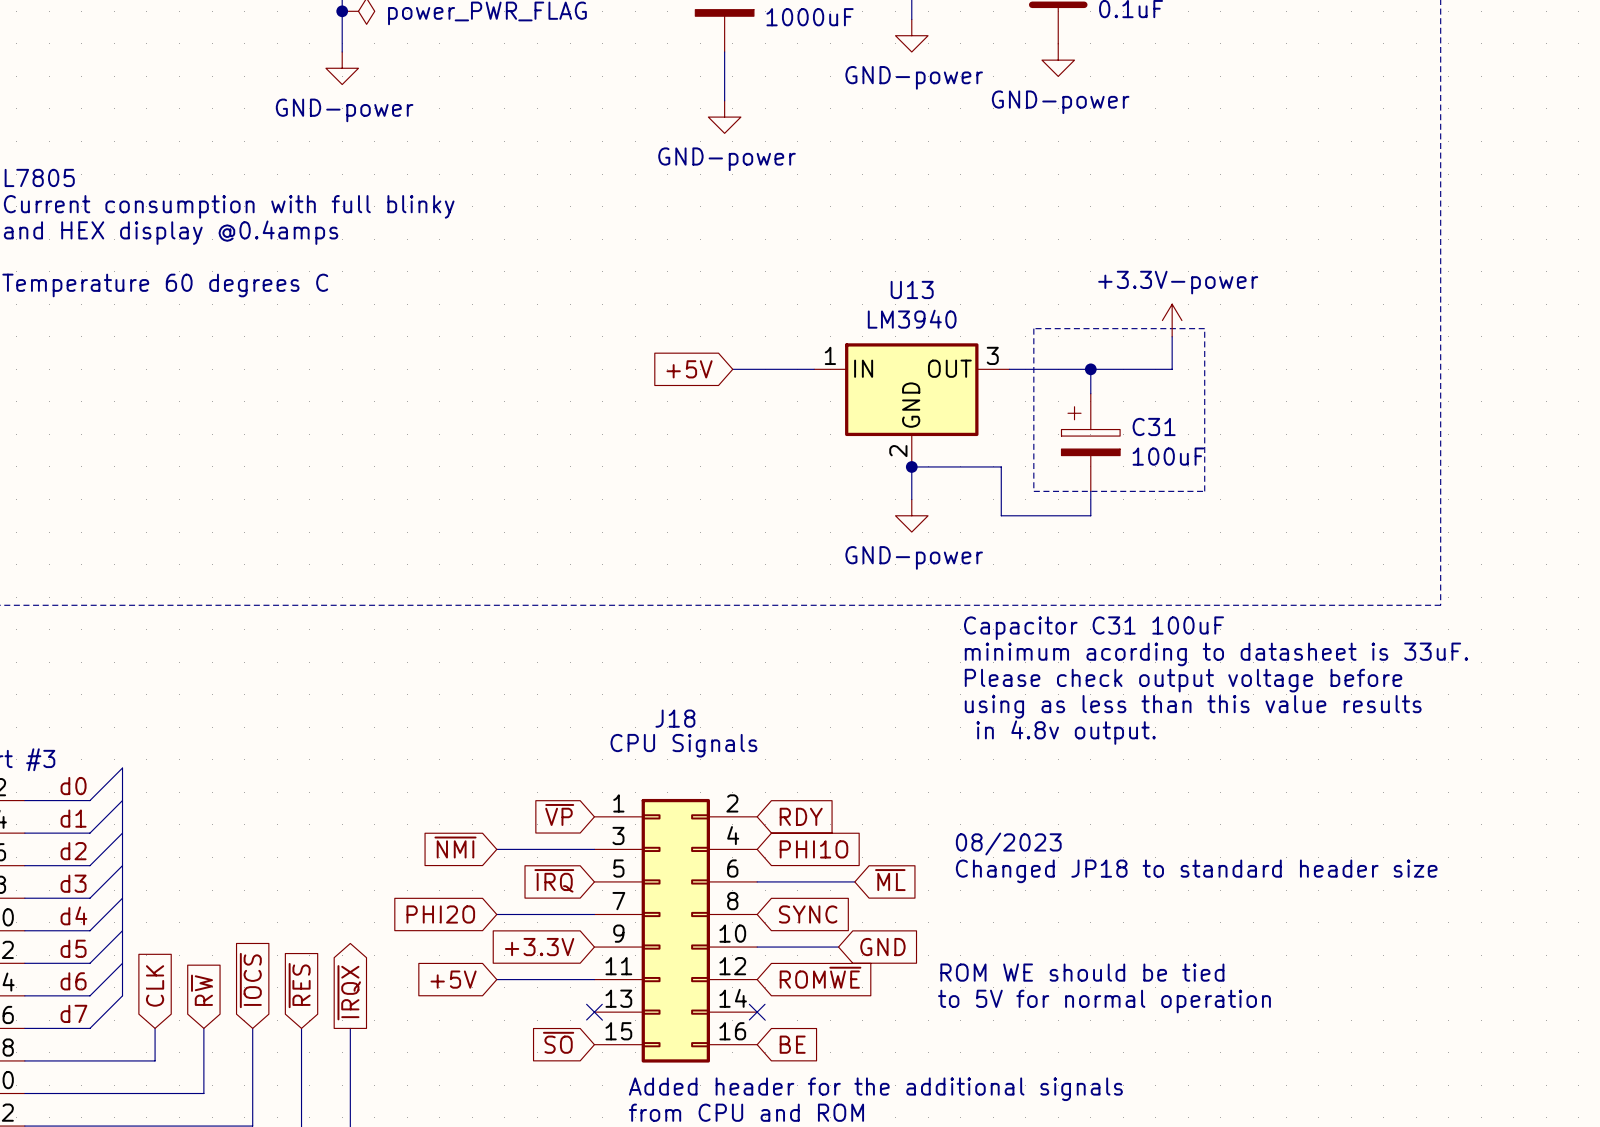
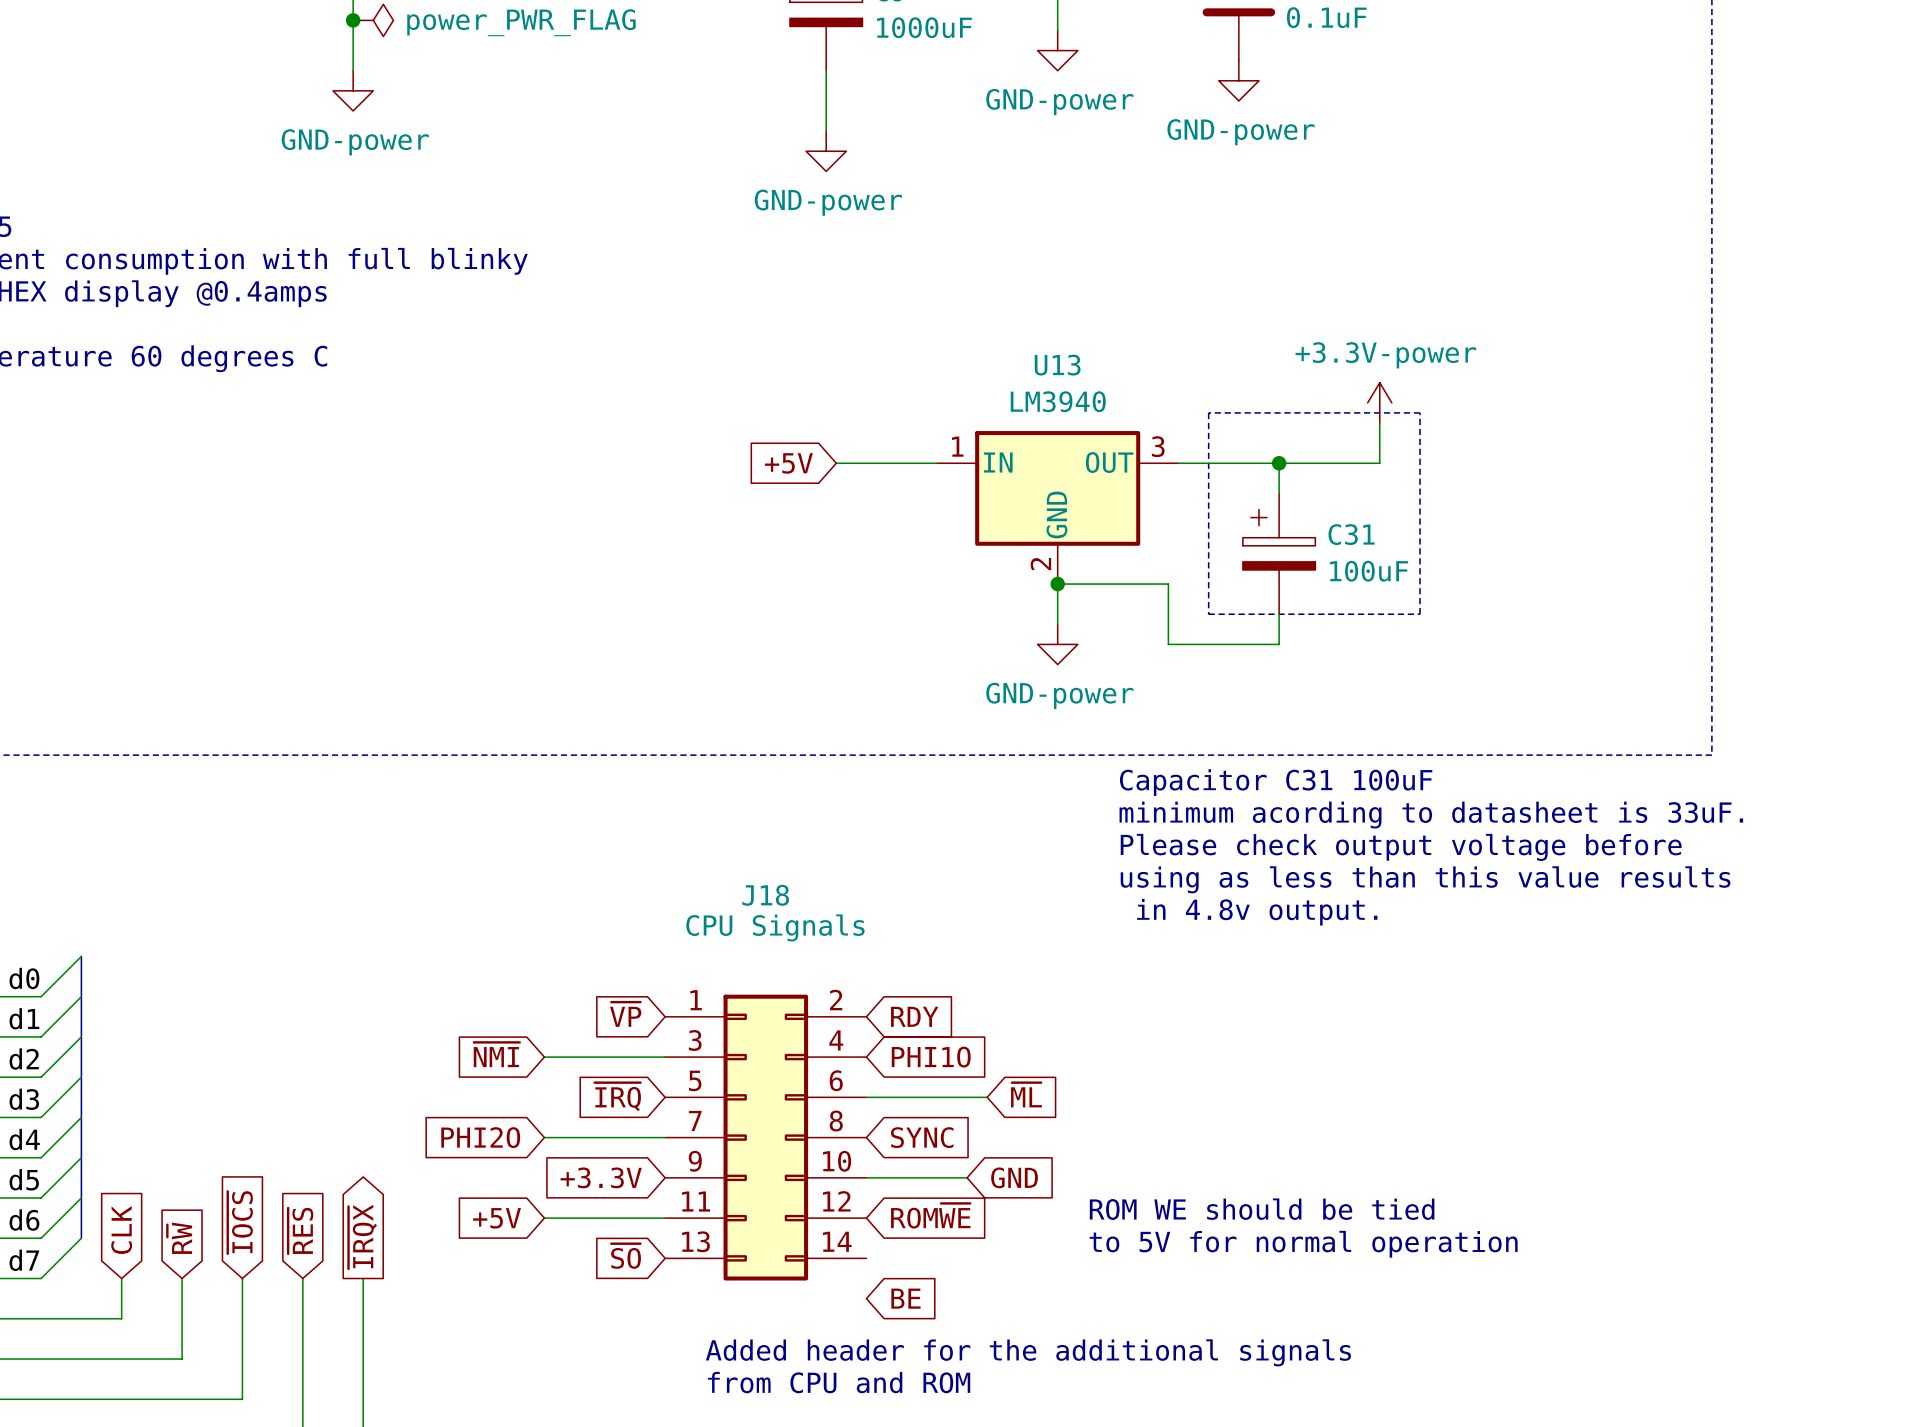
J18 symbol: [594, 798, 758, 1063] -> [665, 994, 867, 1281]
text: 08/2023 (1008, 843) -> none
text: Changed JP18 to standard header size (1196, 871) -> none
no-connect mark: (594, 1012) -> none
no-connect mark: (757, 1012) -> none
global label position: ~{SO} (558, 1042) -> ~{SO} (626, 1256)

